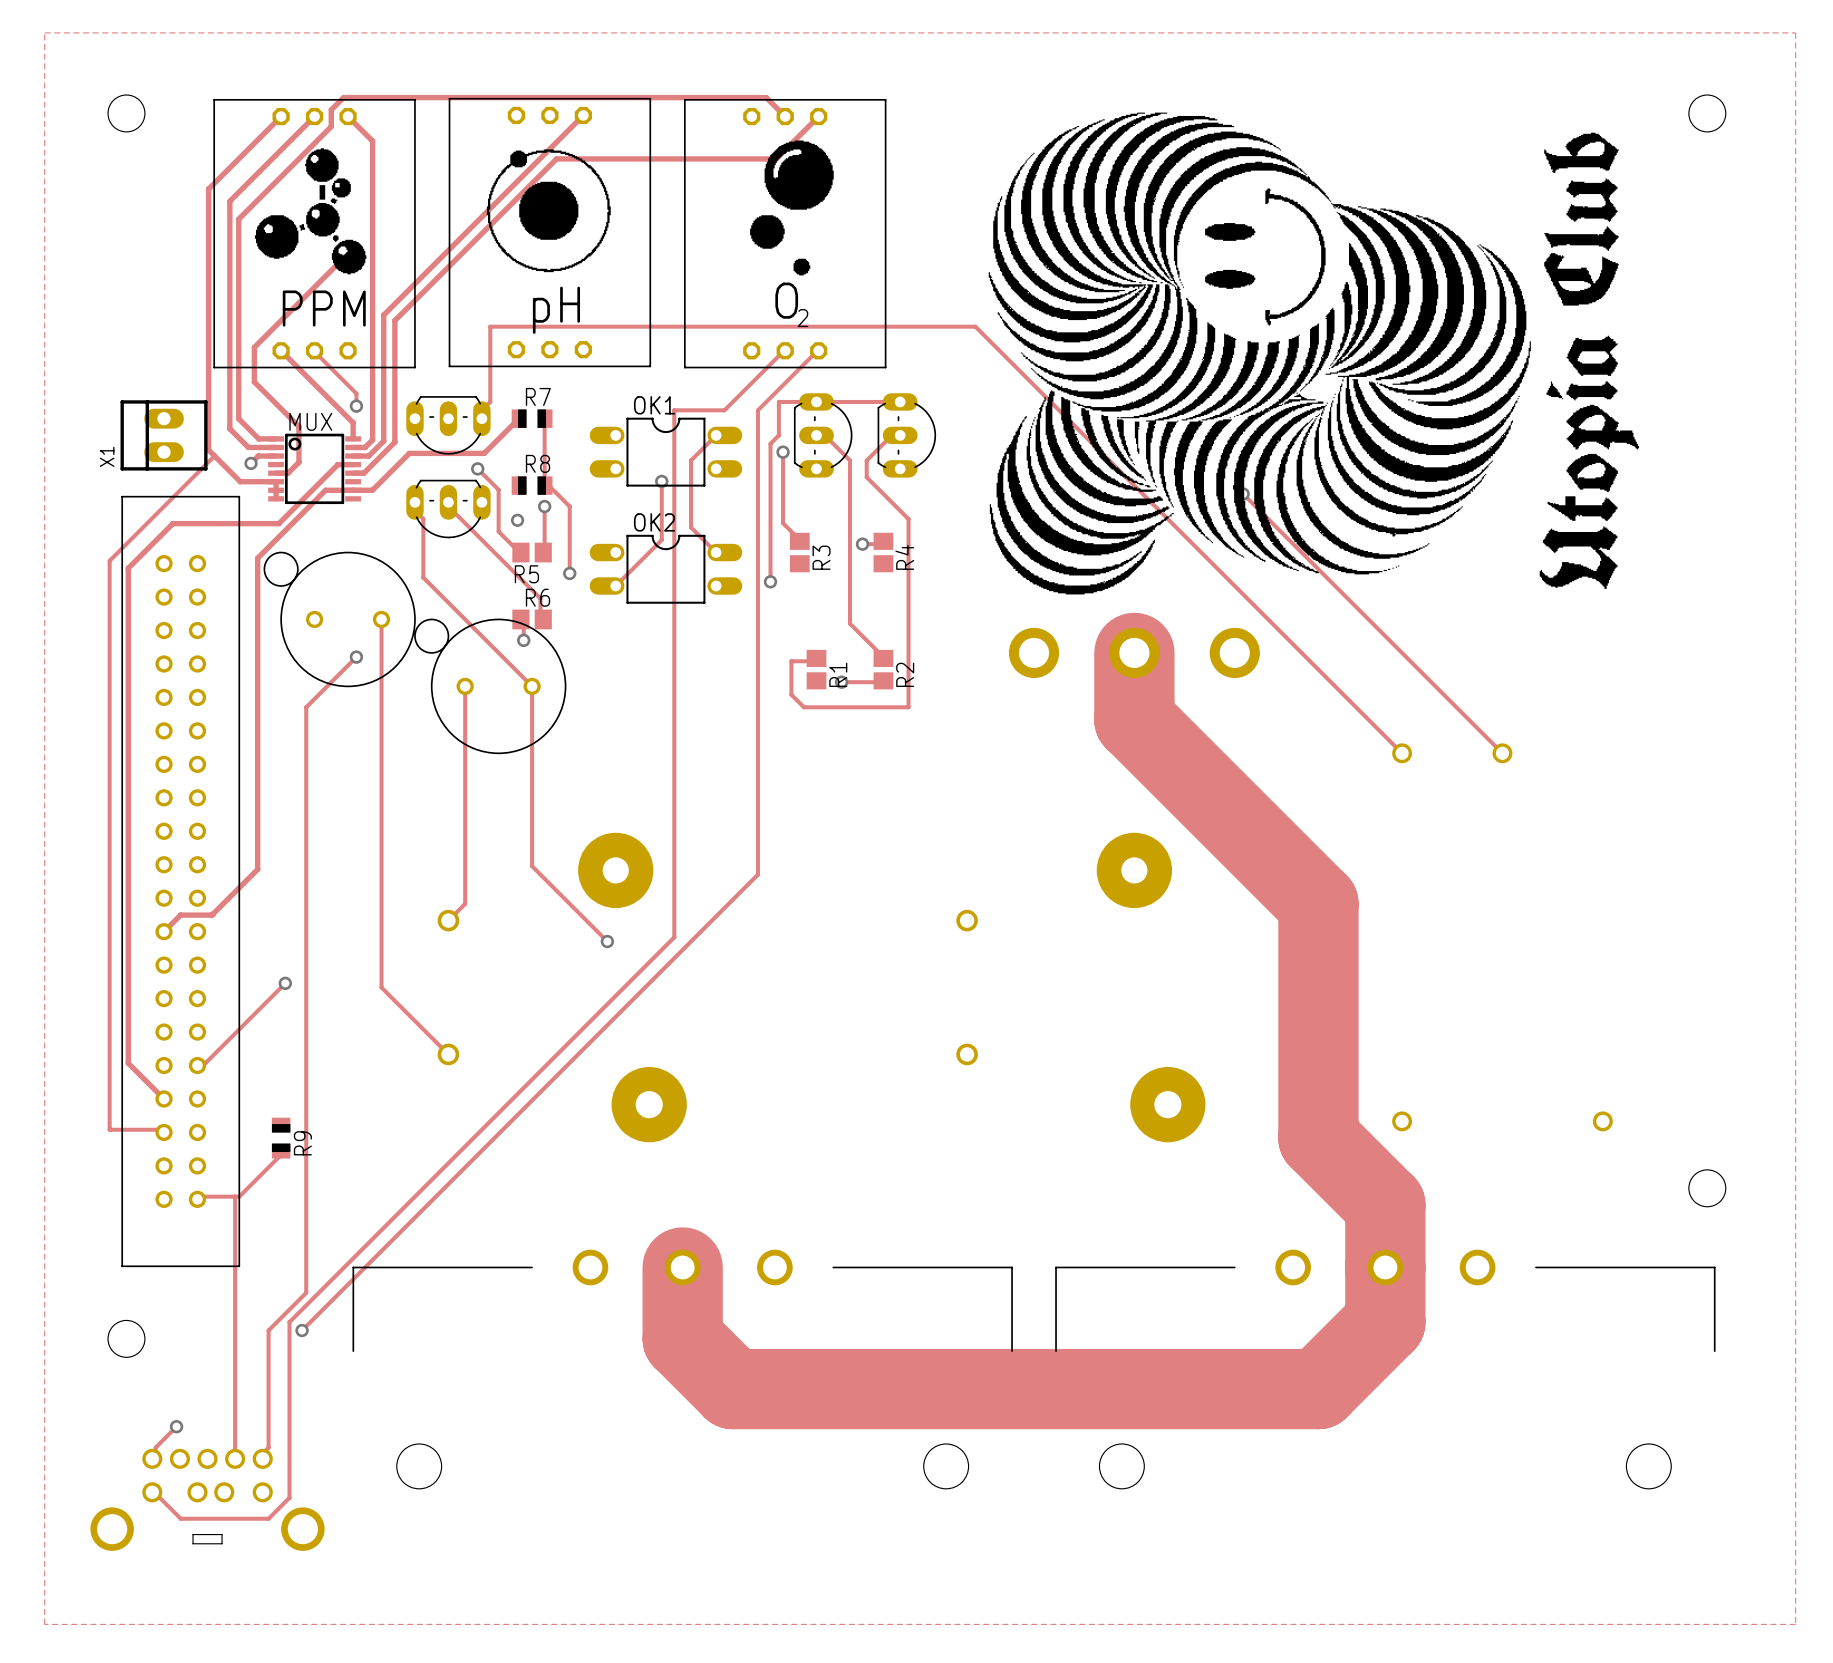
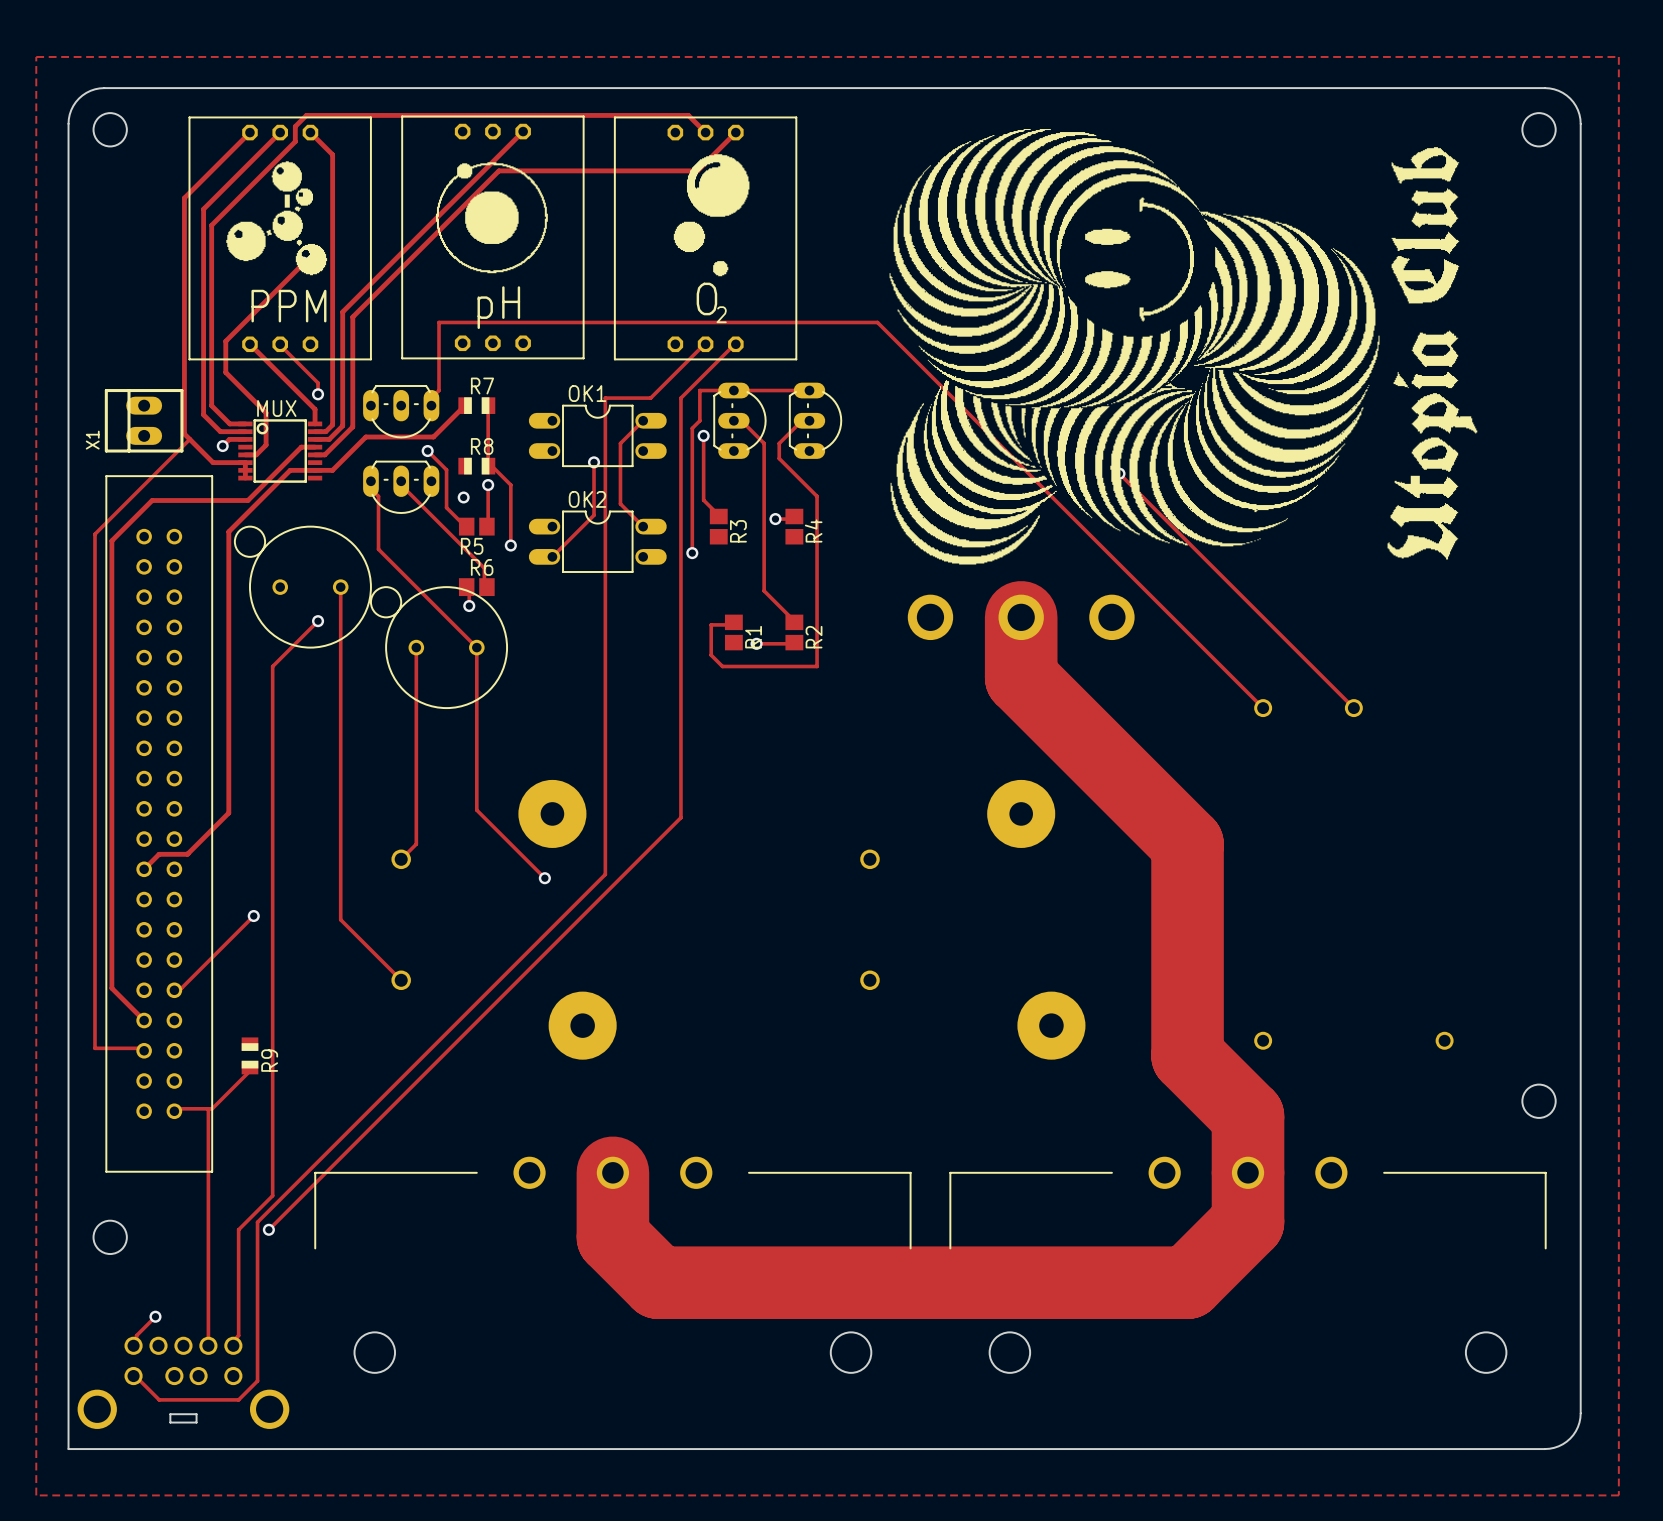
board edge: none -> (104, 88) (1544, 88) (1558, 90) (1570, 98) (1577, 110) (1580, 123) (1580, 1413) (1577, 1427) (1570, 1438) (1558, 1446) (1544, 1449) (68, 1449) (68, 123) (71, 110) (78, 98) (90, 90) (104, 88)

